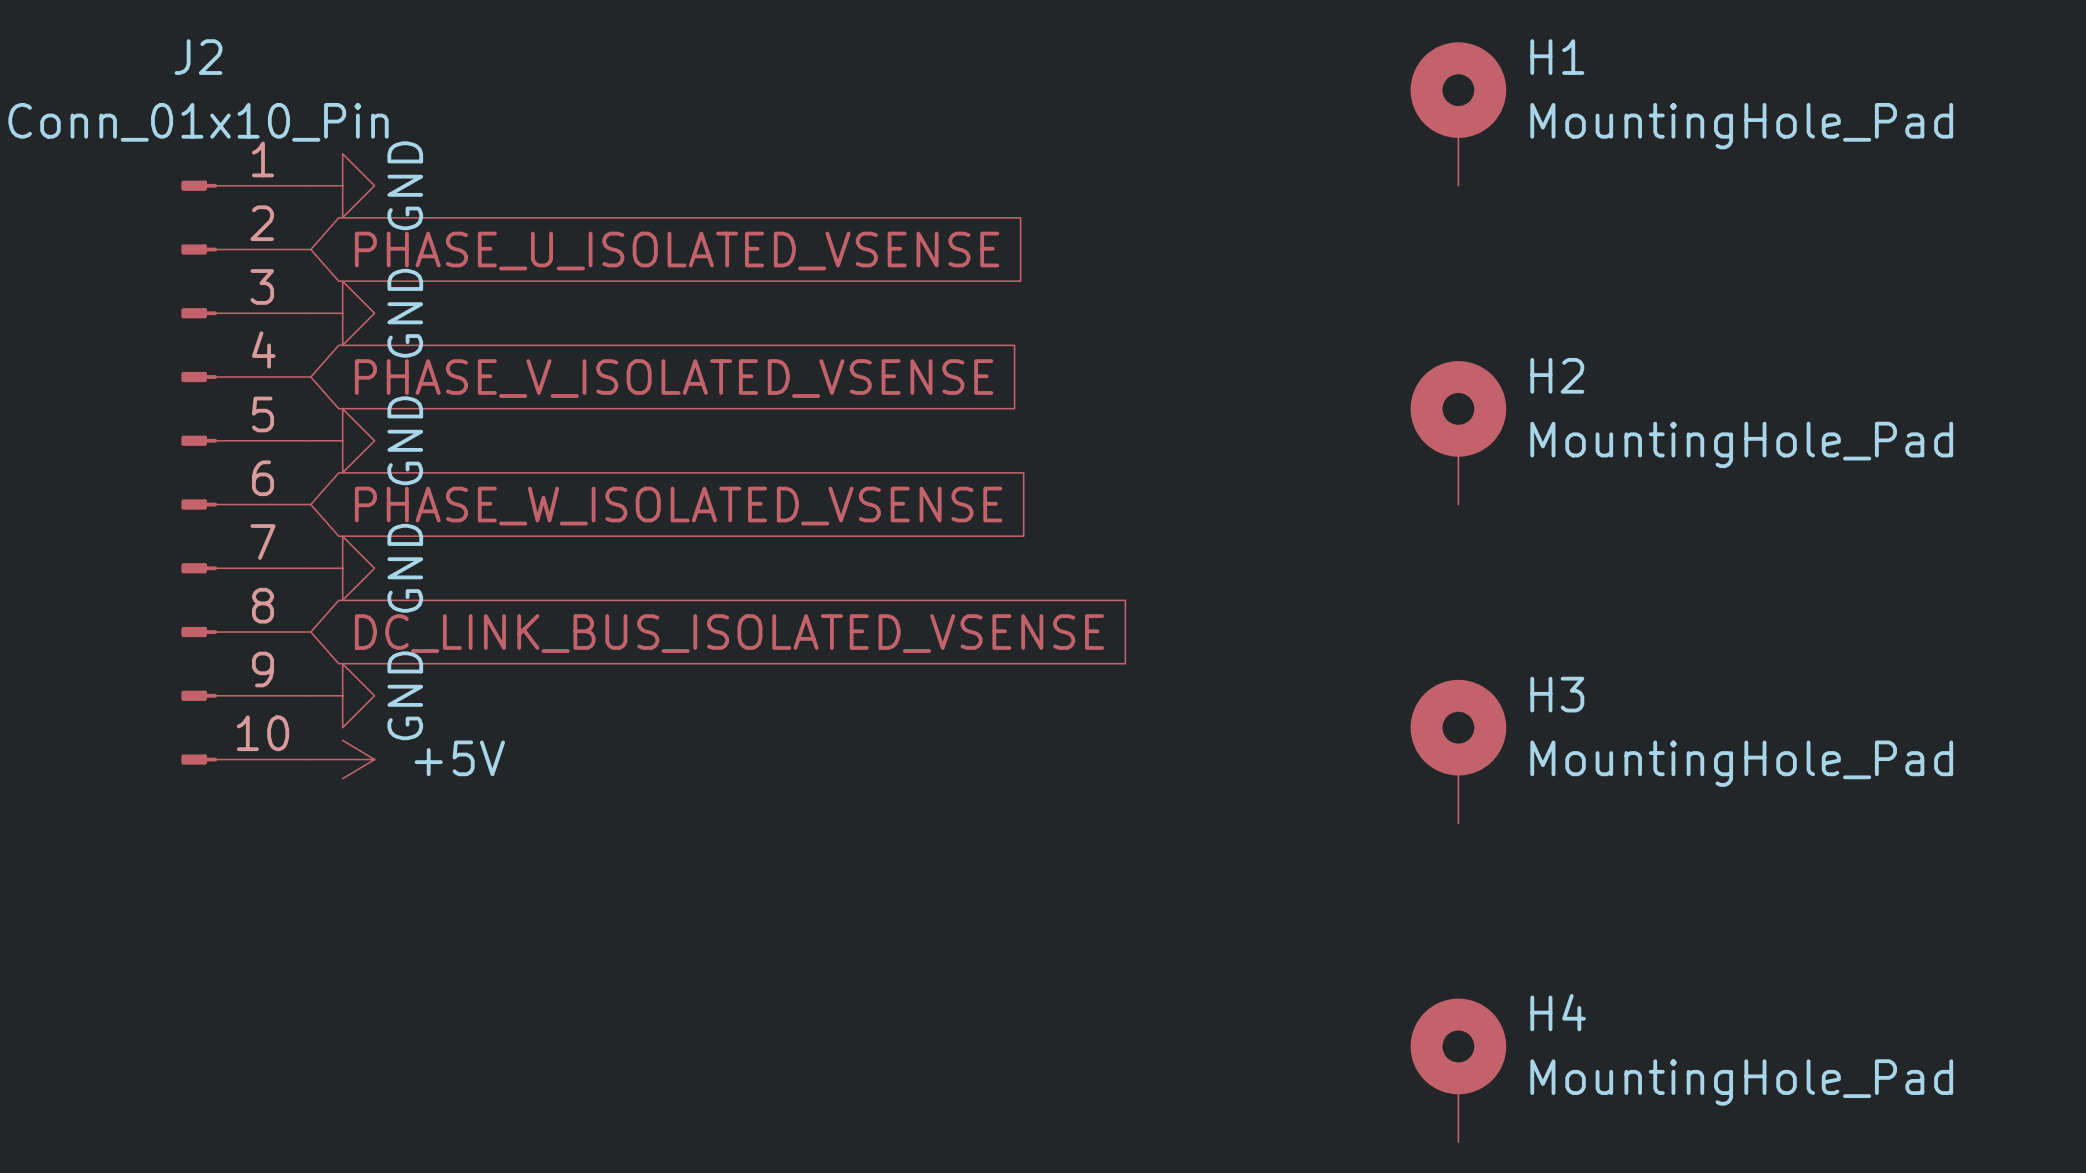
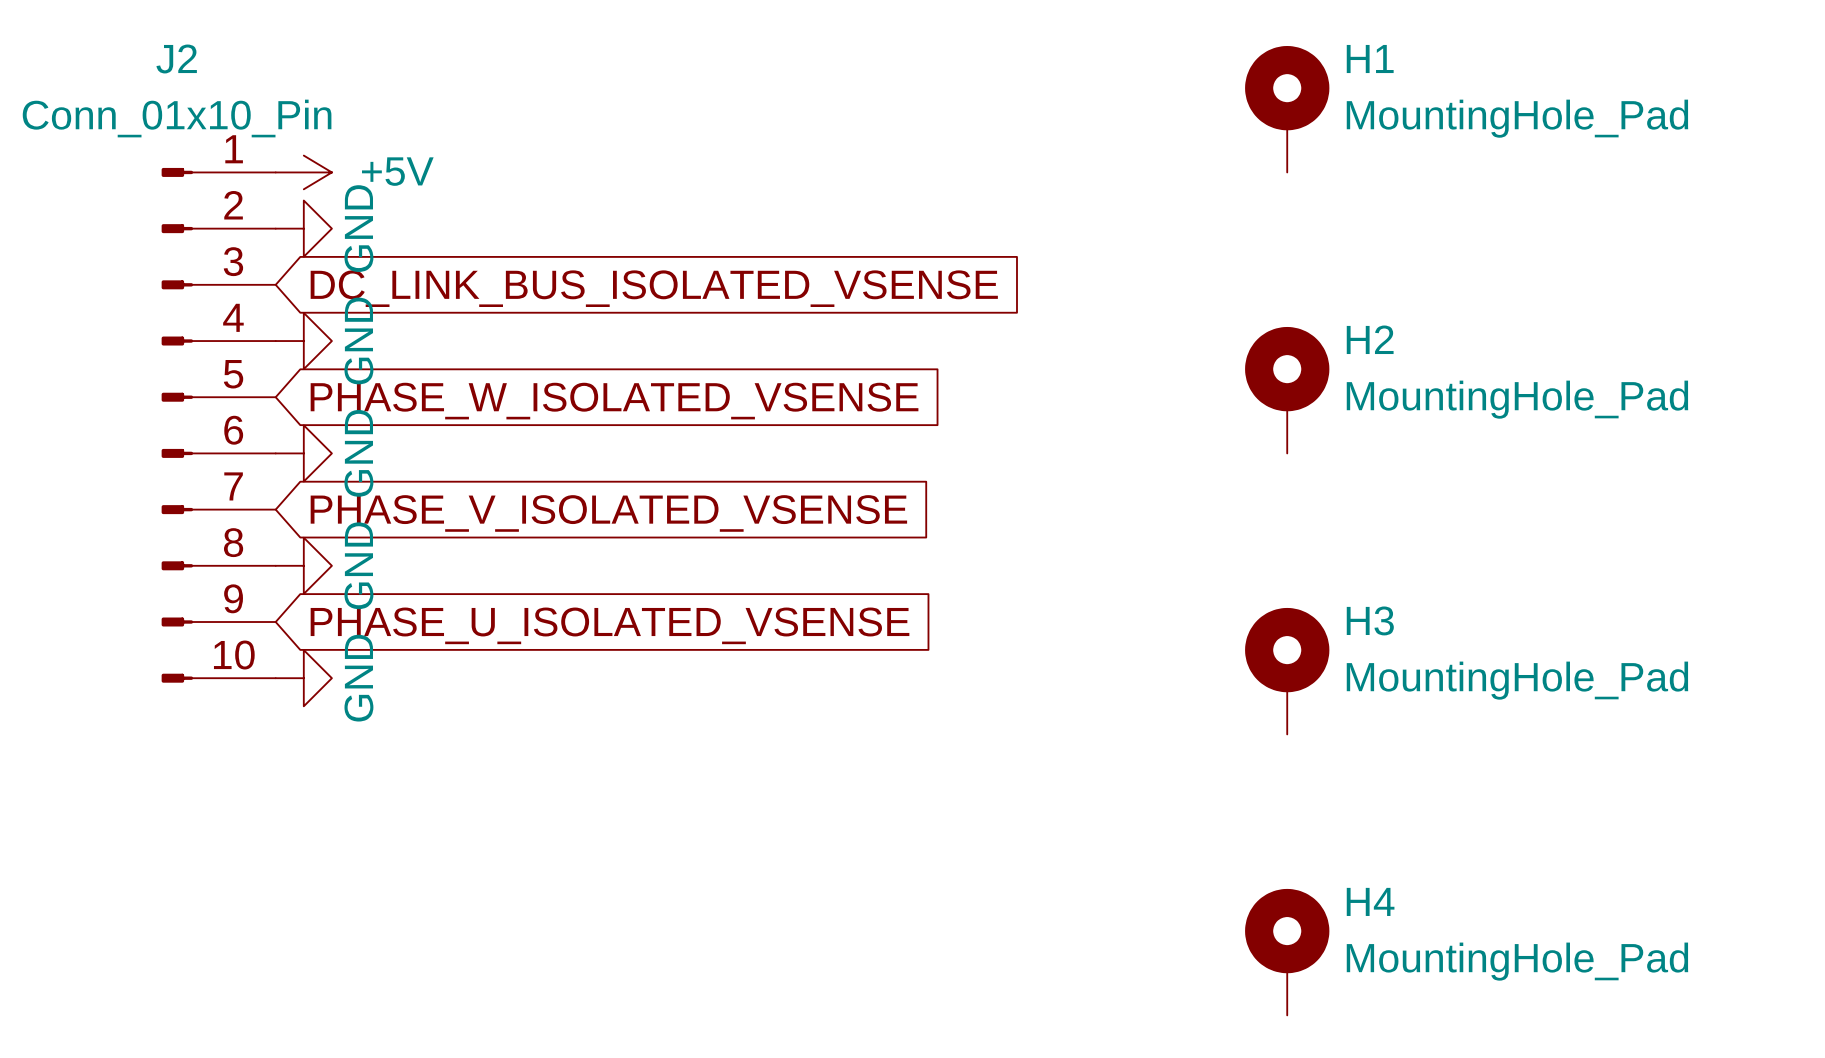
power symbol: GND (342, 185) -> +5V (303, 172)
power symbol: none -> GND (303, 228)
global label position: PHASE_U_ISOLATED_VSENSE (677, 251) -> PHASE_U_ISOLATED_VSENSE (610, 625)
power symbol: GND (342, 313) -> none
power symbol: none -> GND (303, 341)
global label position: PHASE_V_ISOLATED_VSENSE (674, 378) -> PHASE_V_ISOLATED_VSENSE (608, 513)
power symbol: GND (342, 440) -> none
power symbol: none -> GND (303, 453)
global label position: PHASE_W_ISOLATED_VSENSE (678, 506) -> PHASE_W_ISOLATED_VSENSE (614, 401)
power symbol: GND (342, 568) -> none
power symbol: none -> GND (303, 565)
global label position: DC_LINK_BUS_ISOLATED_VSENSE (729, 633) -> DC_LINK_BUS_ISOLATED_VSENSE (654, 288)
power symbol: GND (342, 695) -> none
power symbol: +5V (342, 759) -> GND (303, 678)

